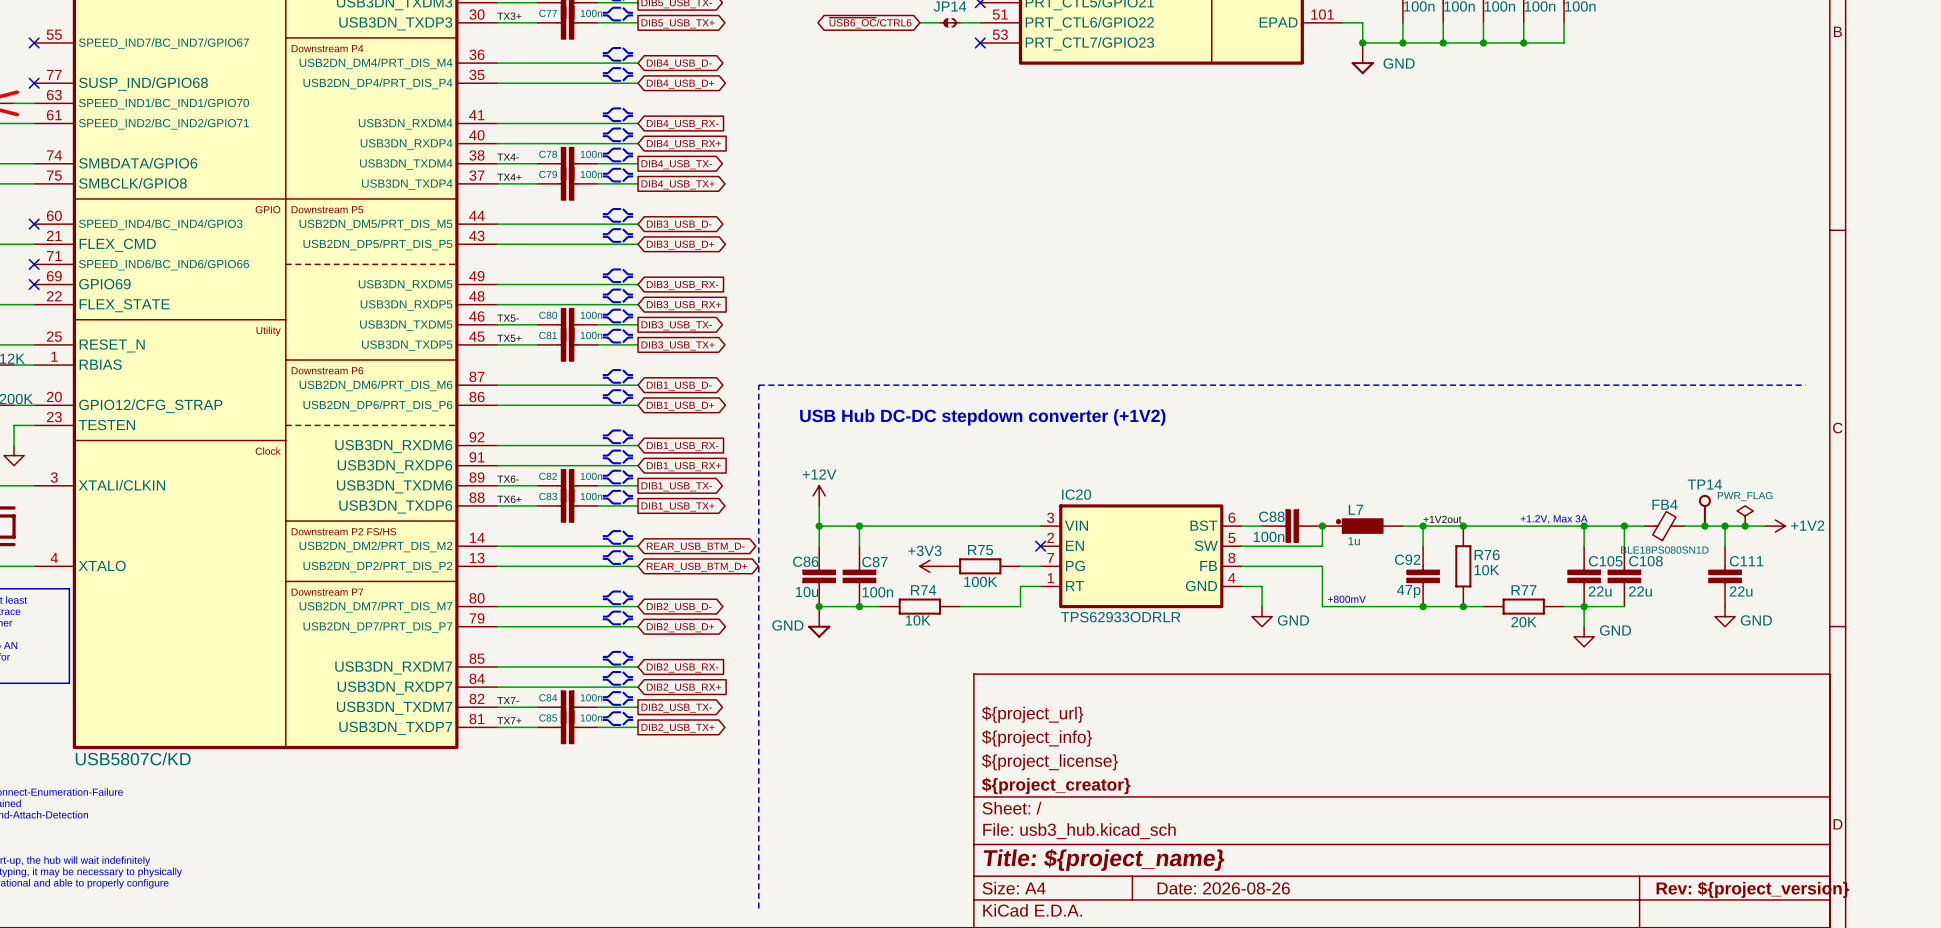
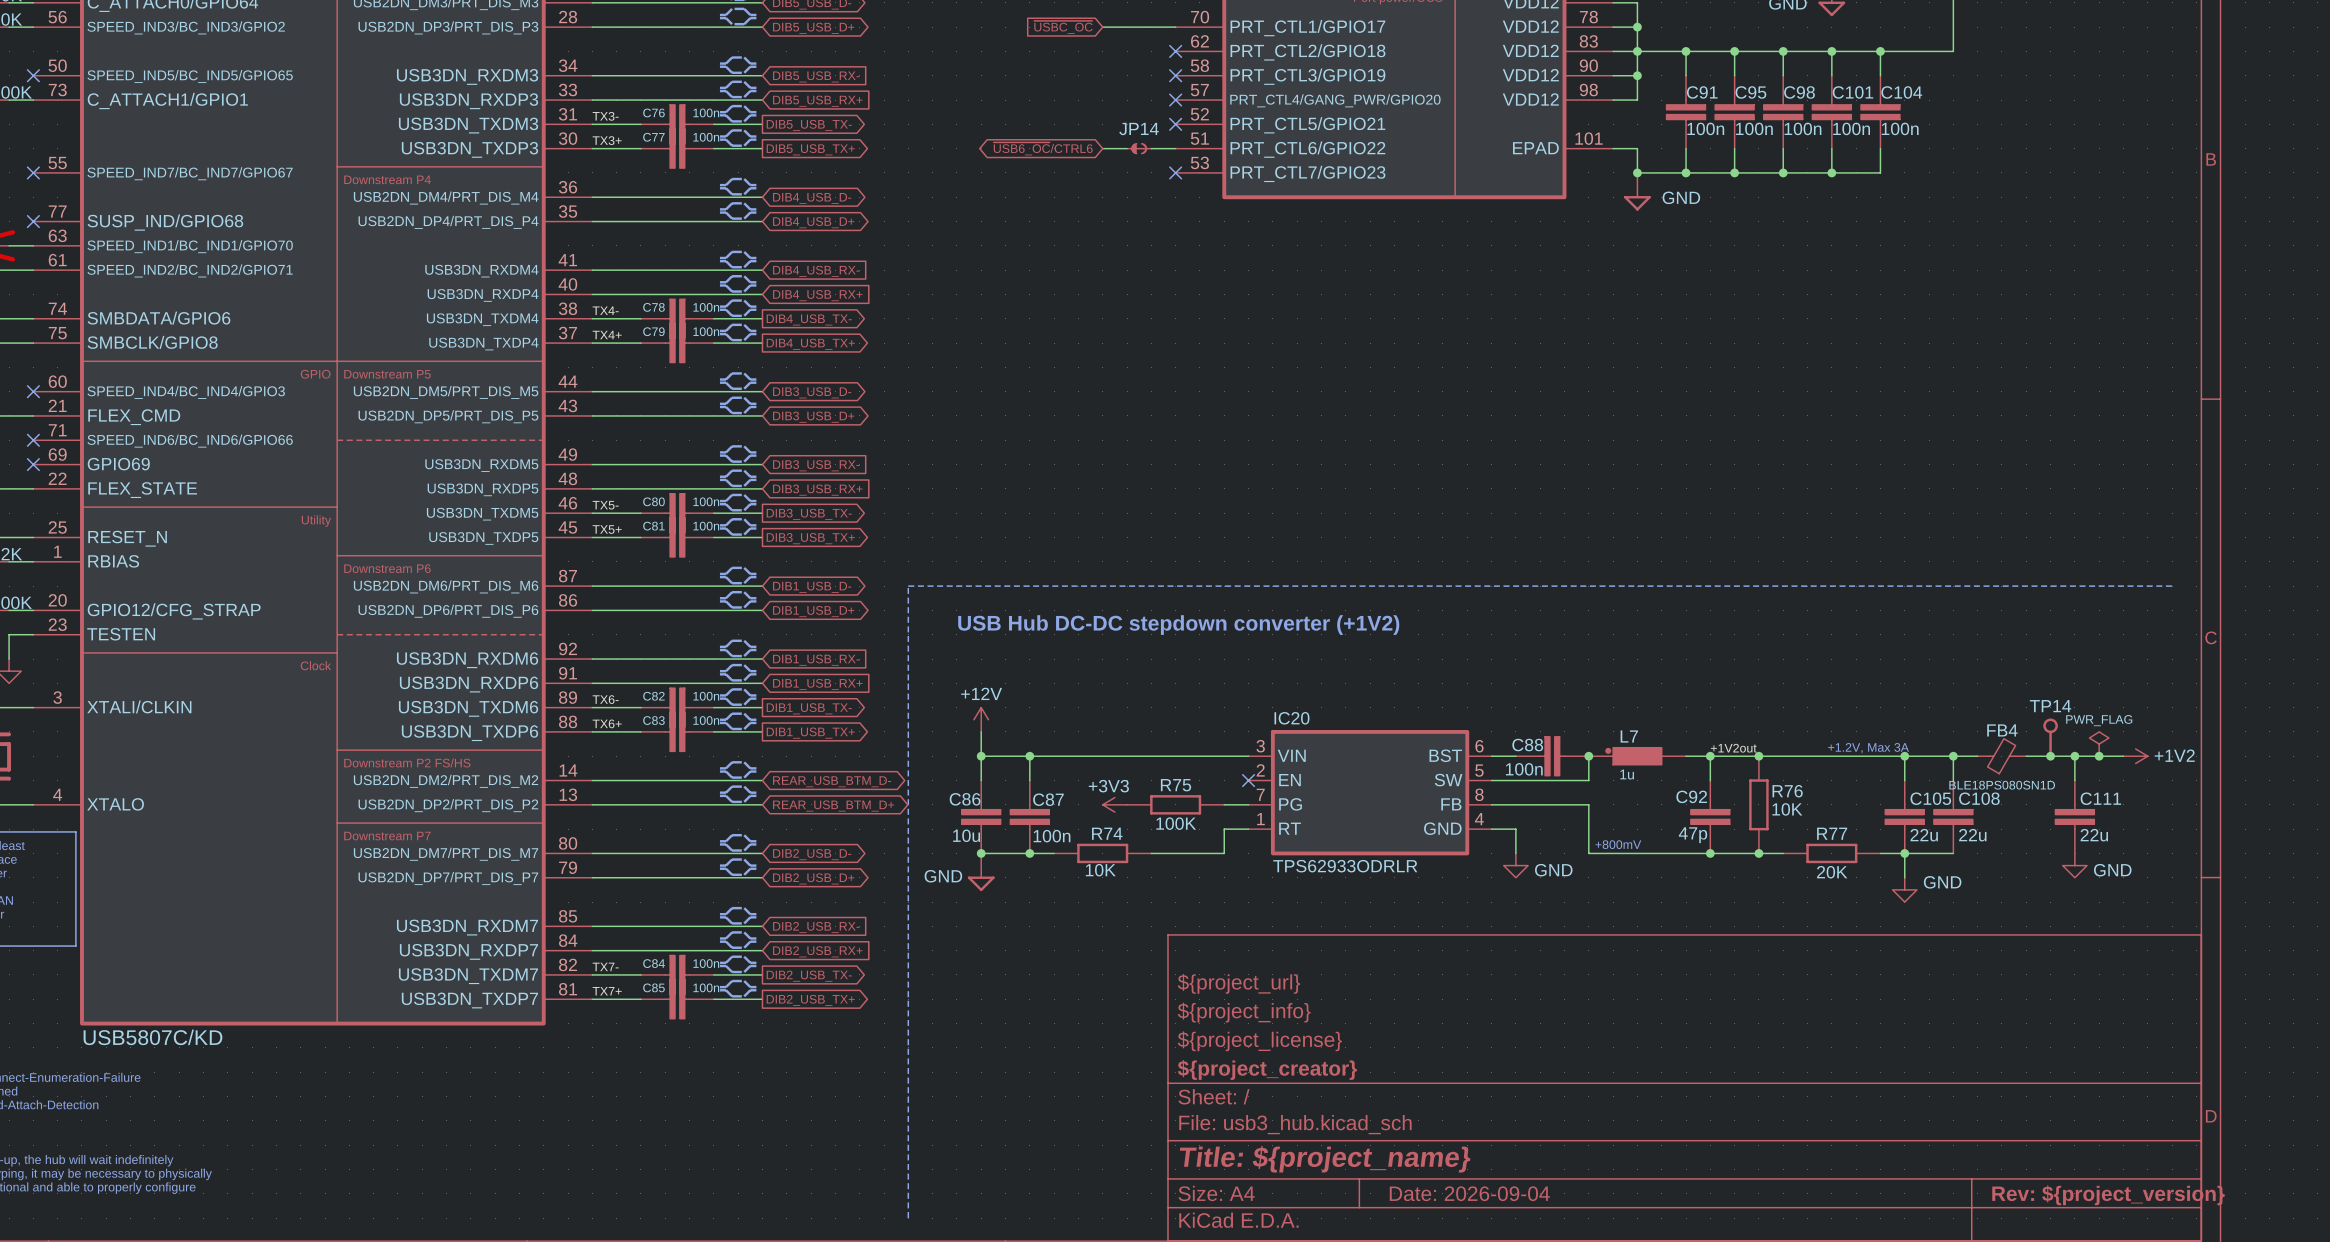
title block: Date: 2026-08-26 (1223, 888) -> Date: 2026-09-04 (1469, 1193)

